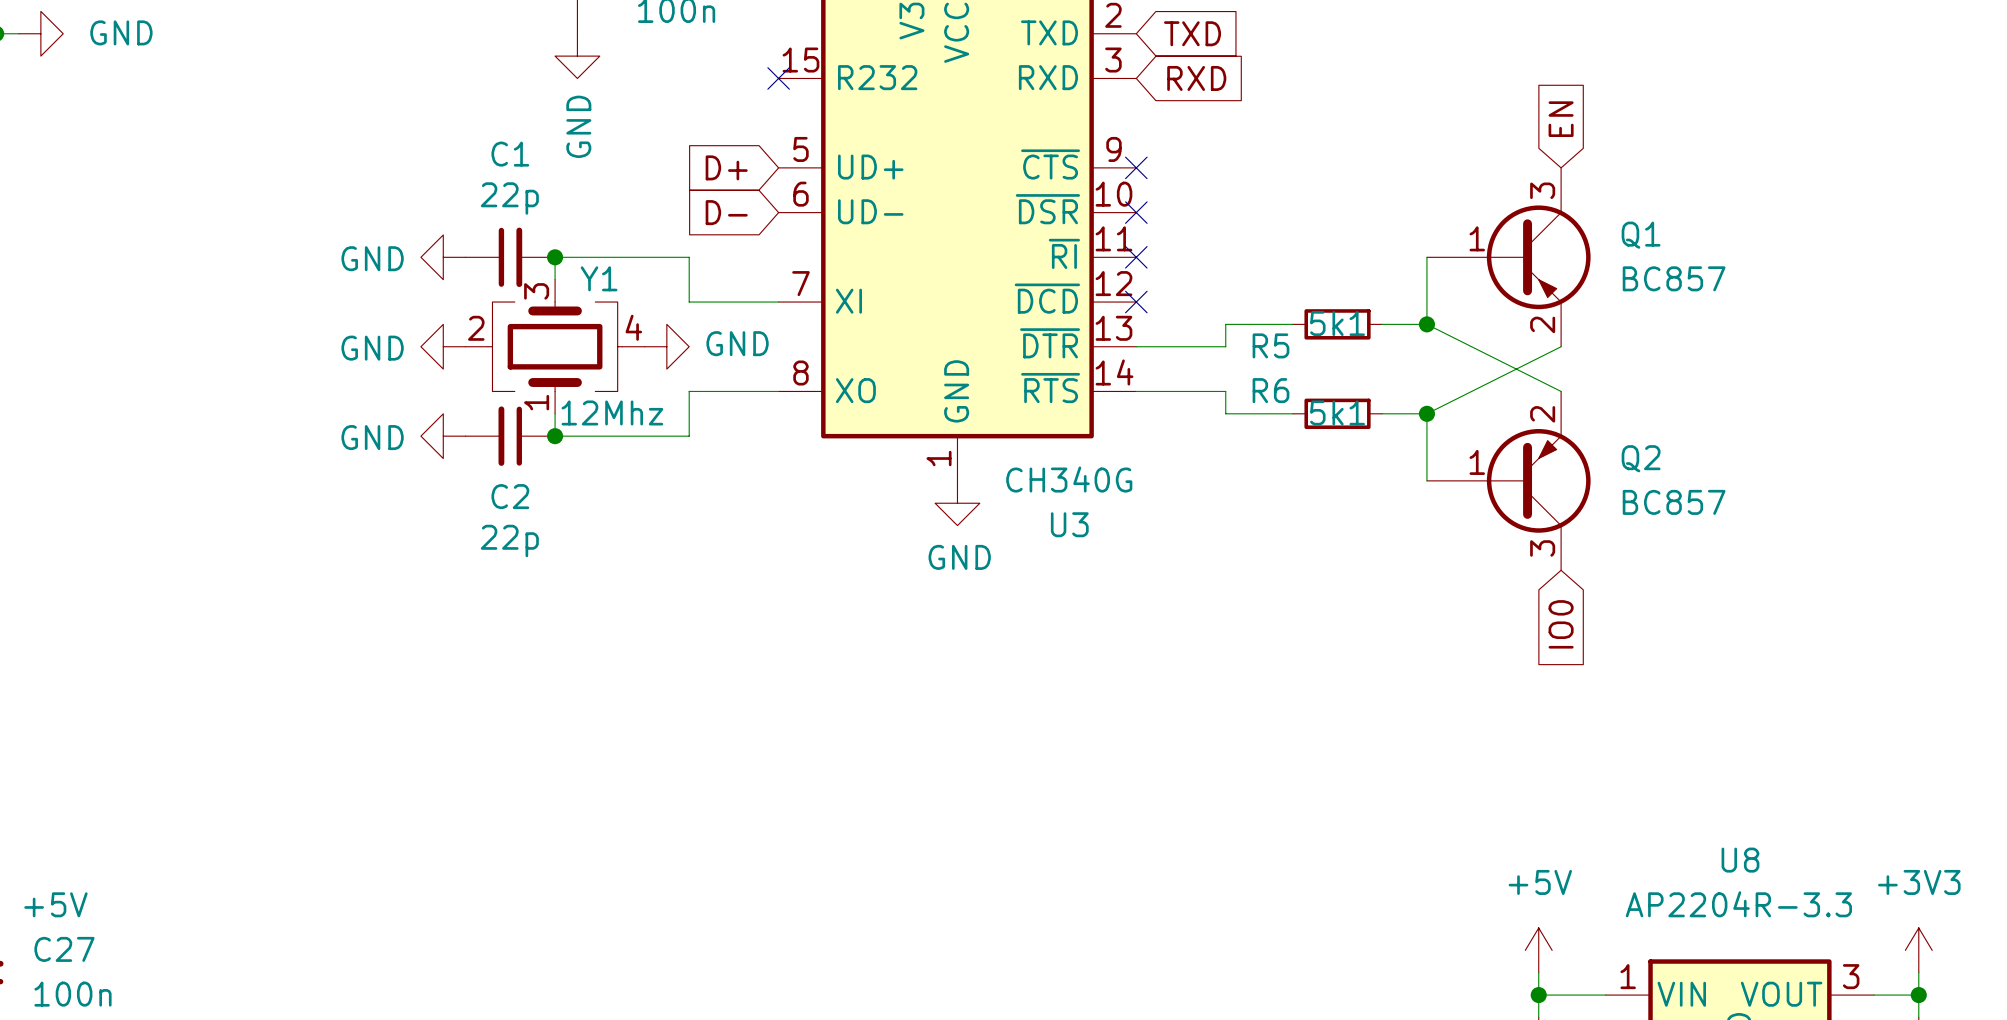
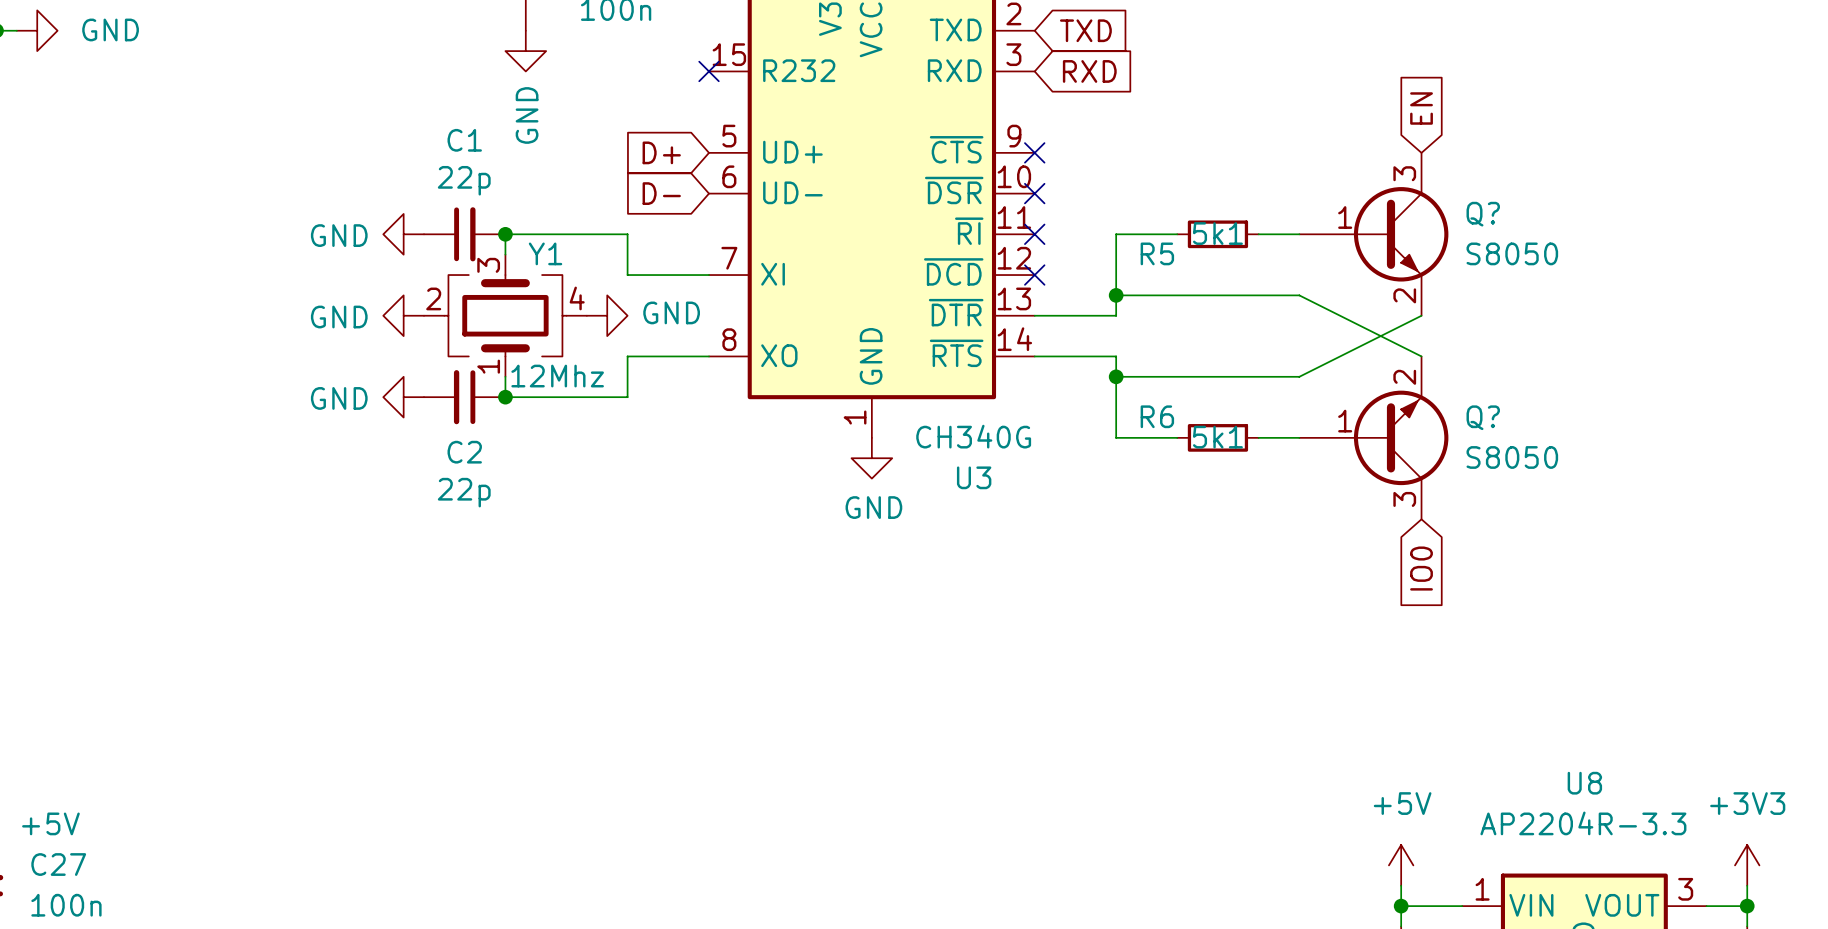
wire: none -> (1177, 234) (1116, 234) (1116, 295)
wire: (1426, 257) (1426, 324) -> (1299, 234) (1258, 234)
Q1: BC857 (1508, 257) -> none
Q?: none -> S8050 (1373, 234)
junction: none -> (1116, 295)
wire: none -> (1177, 295) (1258, 295)
R5 position: (1337, 324) -> (1217, 234)
junction: (1426, 324) -> none
wire: none -> (1116, 376) (1116, 437) (1177, 437)
junction: none -> (1116, 376)
wire: none -> (1177, 376) (1258, 376)
R6 position: (1337, 413) -> (1217, 437)
wire: (1426, 413) (1426, 480) -> (1258, 437) (1299, 437)
junction: (1426, 413) -> none
Q2: BC857 (1508, 480) -> none
Q?: none -> S8050 (1373, 437)

